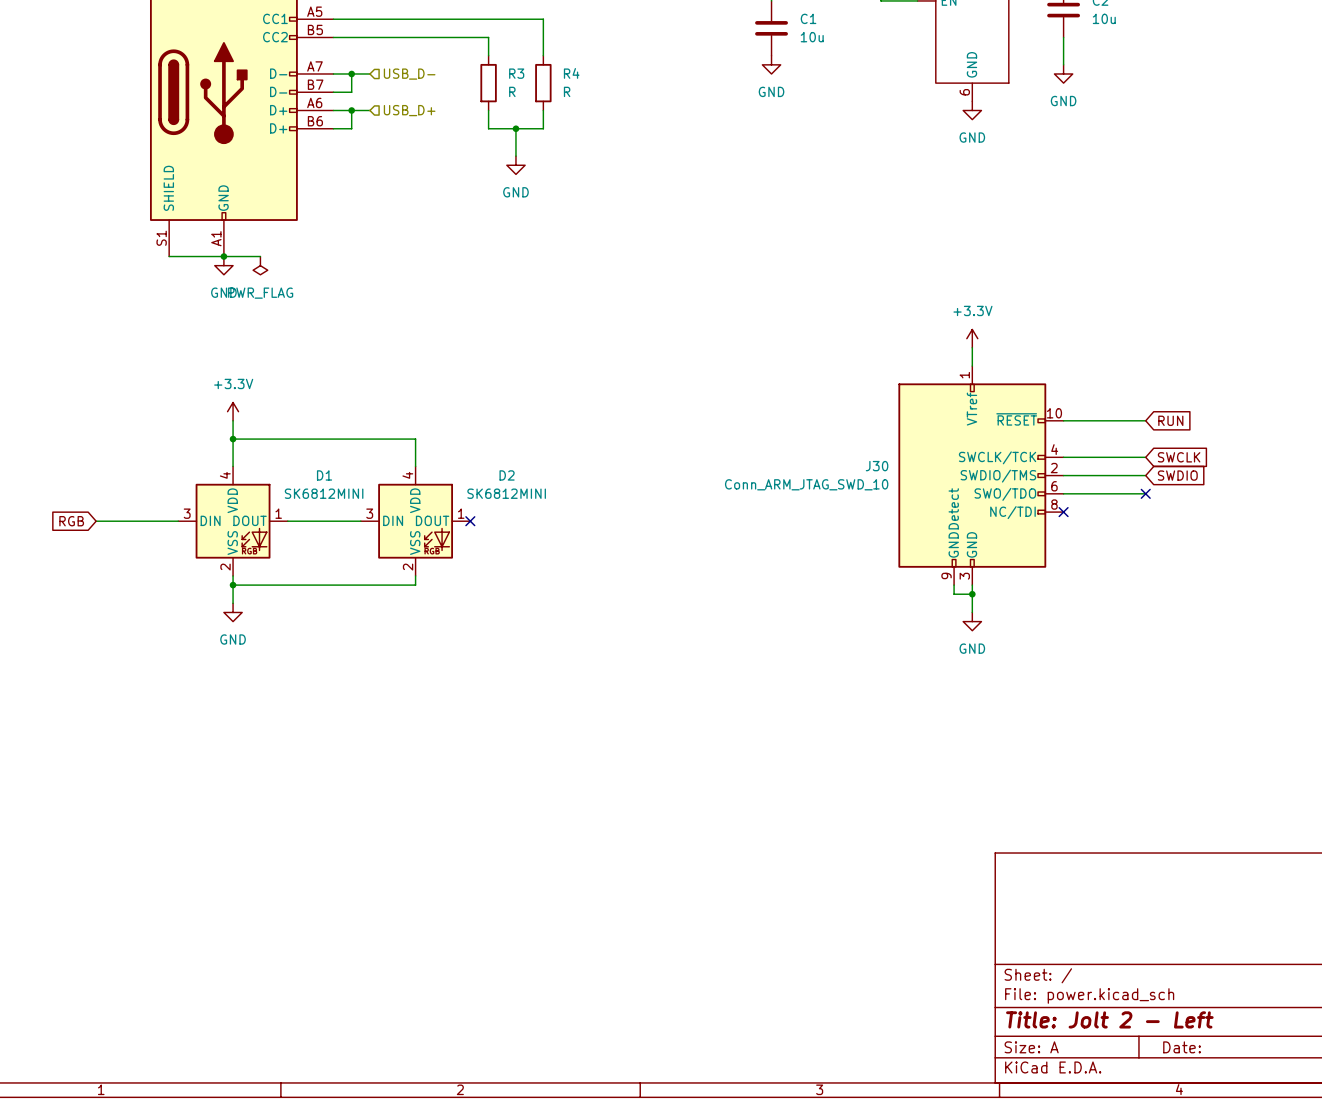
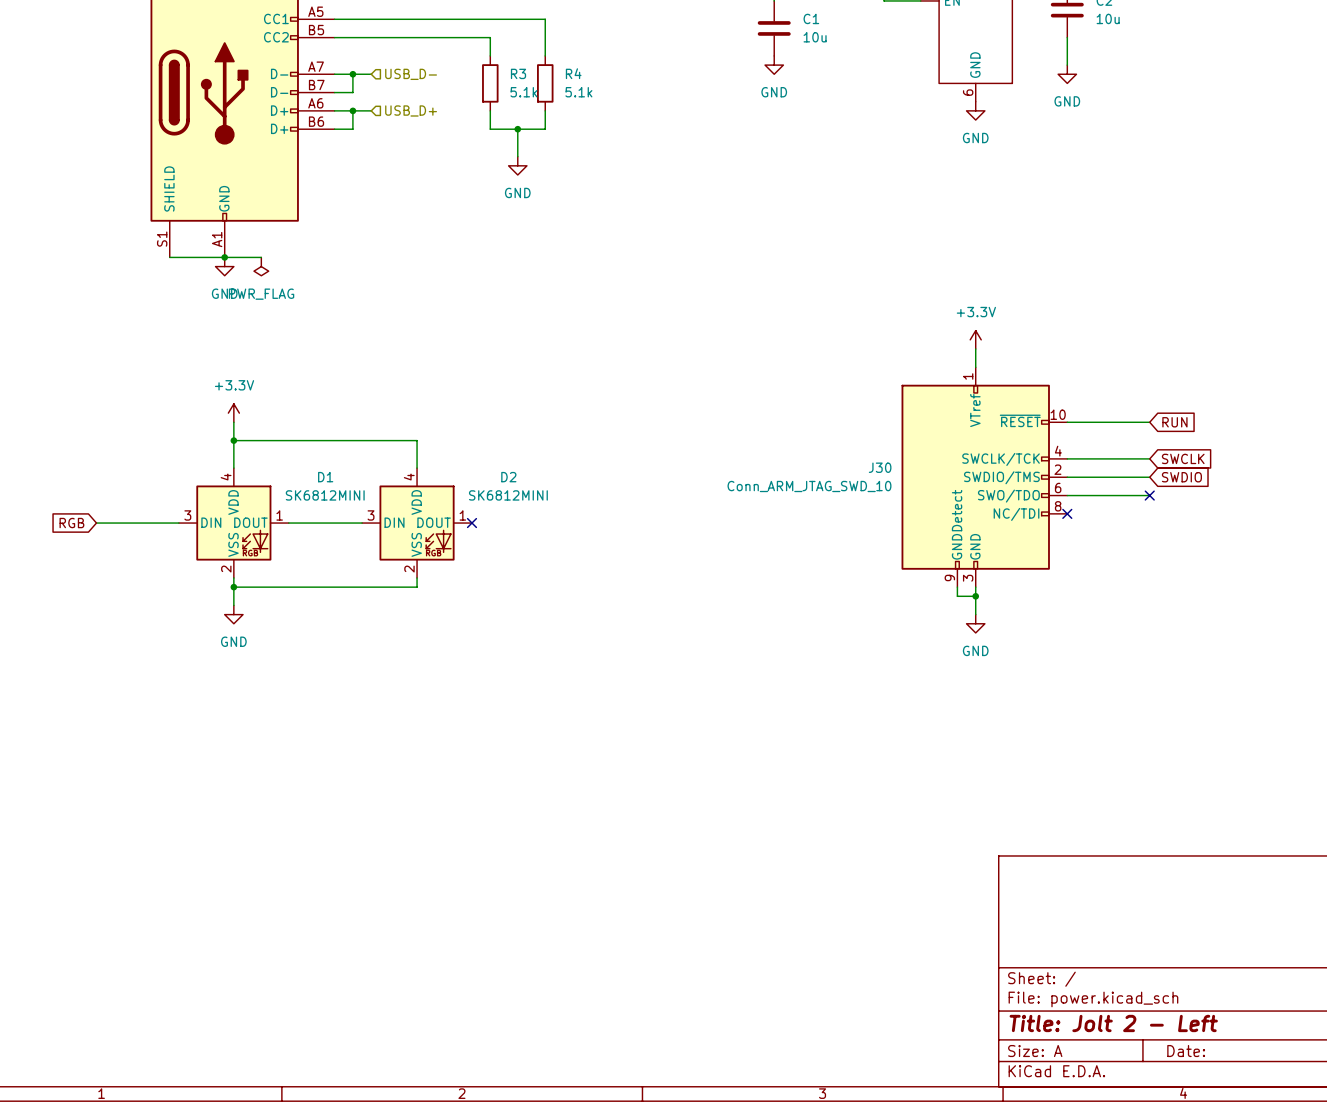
R3 value: R (512, 91) -> 5.1k (523, 92)
R4 value: R (567, 91) -> 5.1k (578, 92)

